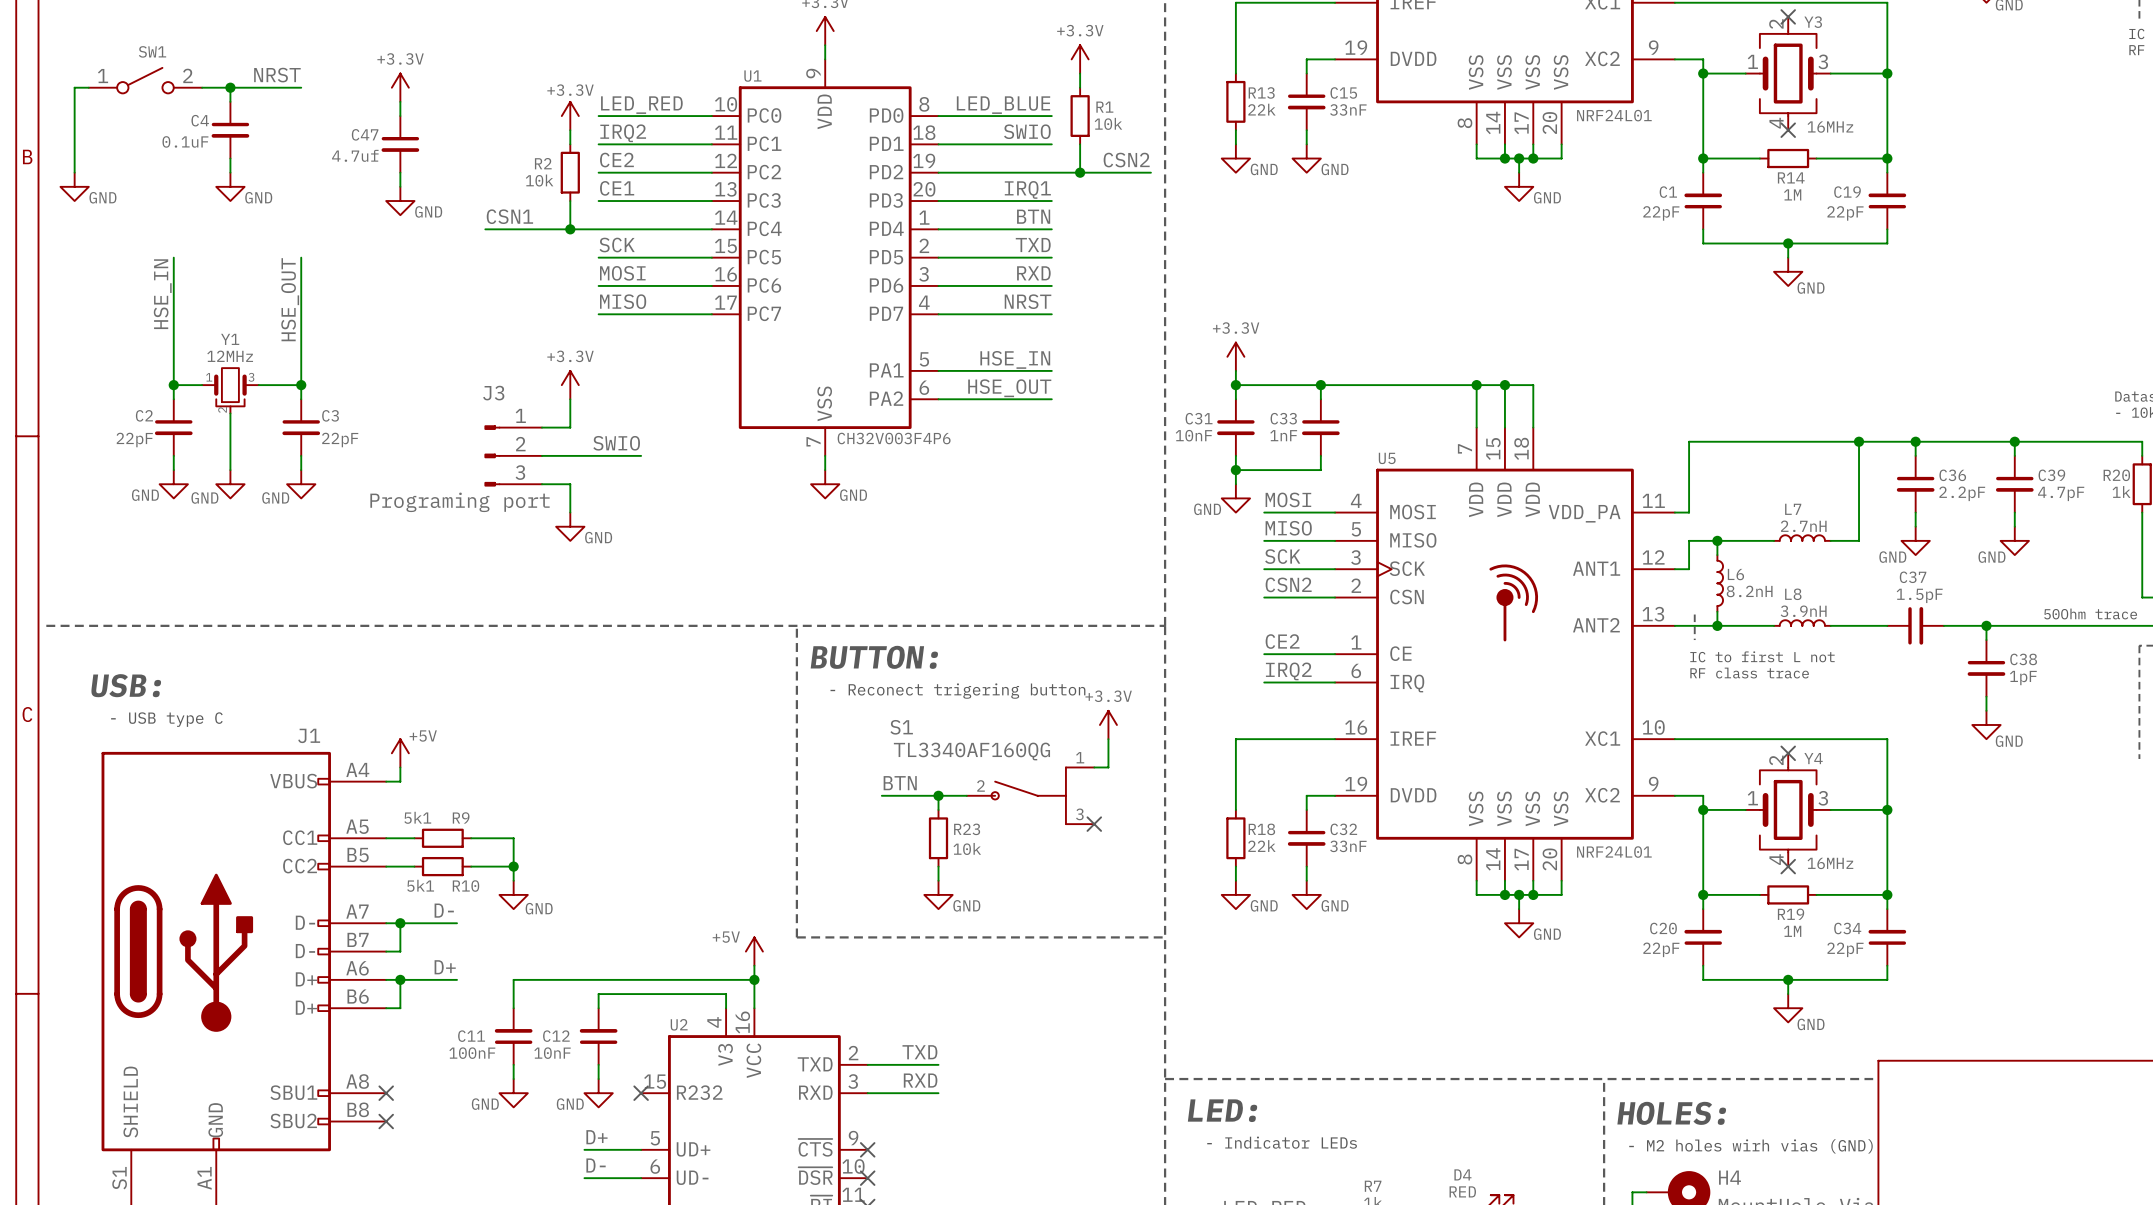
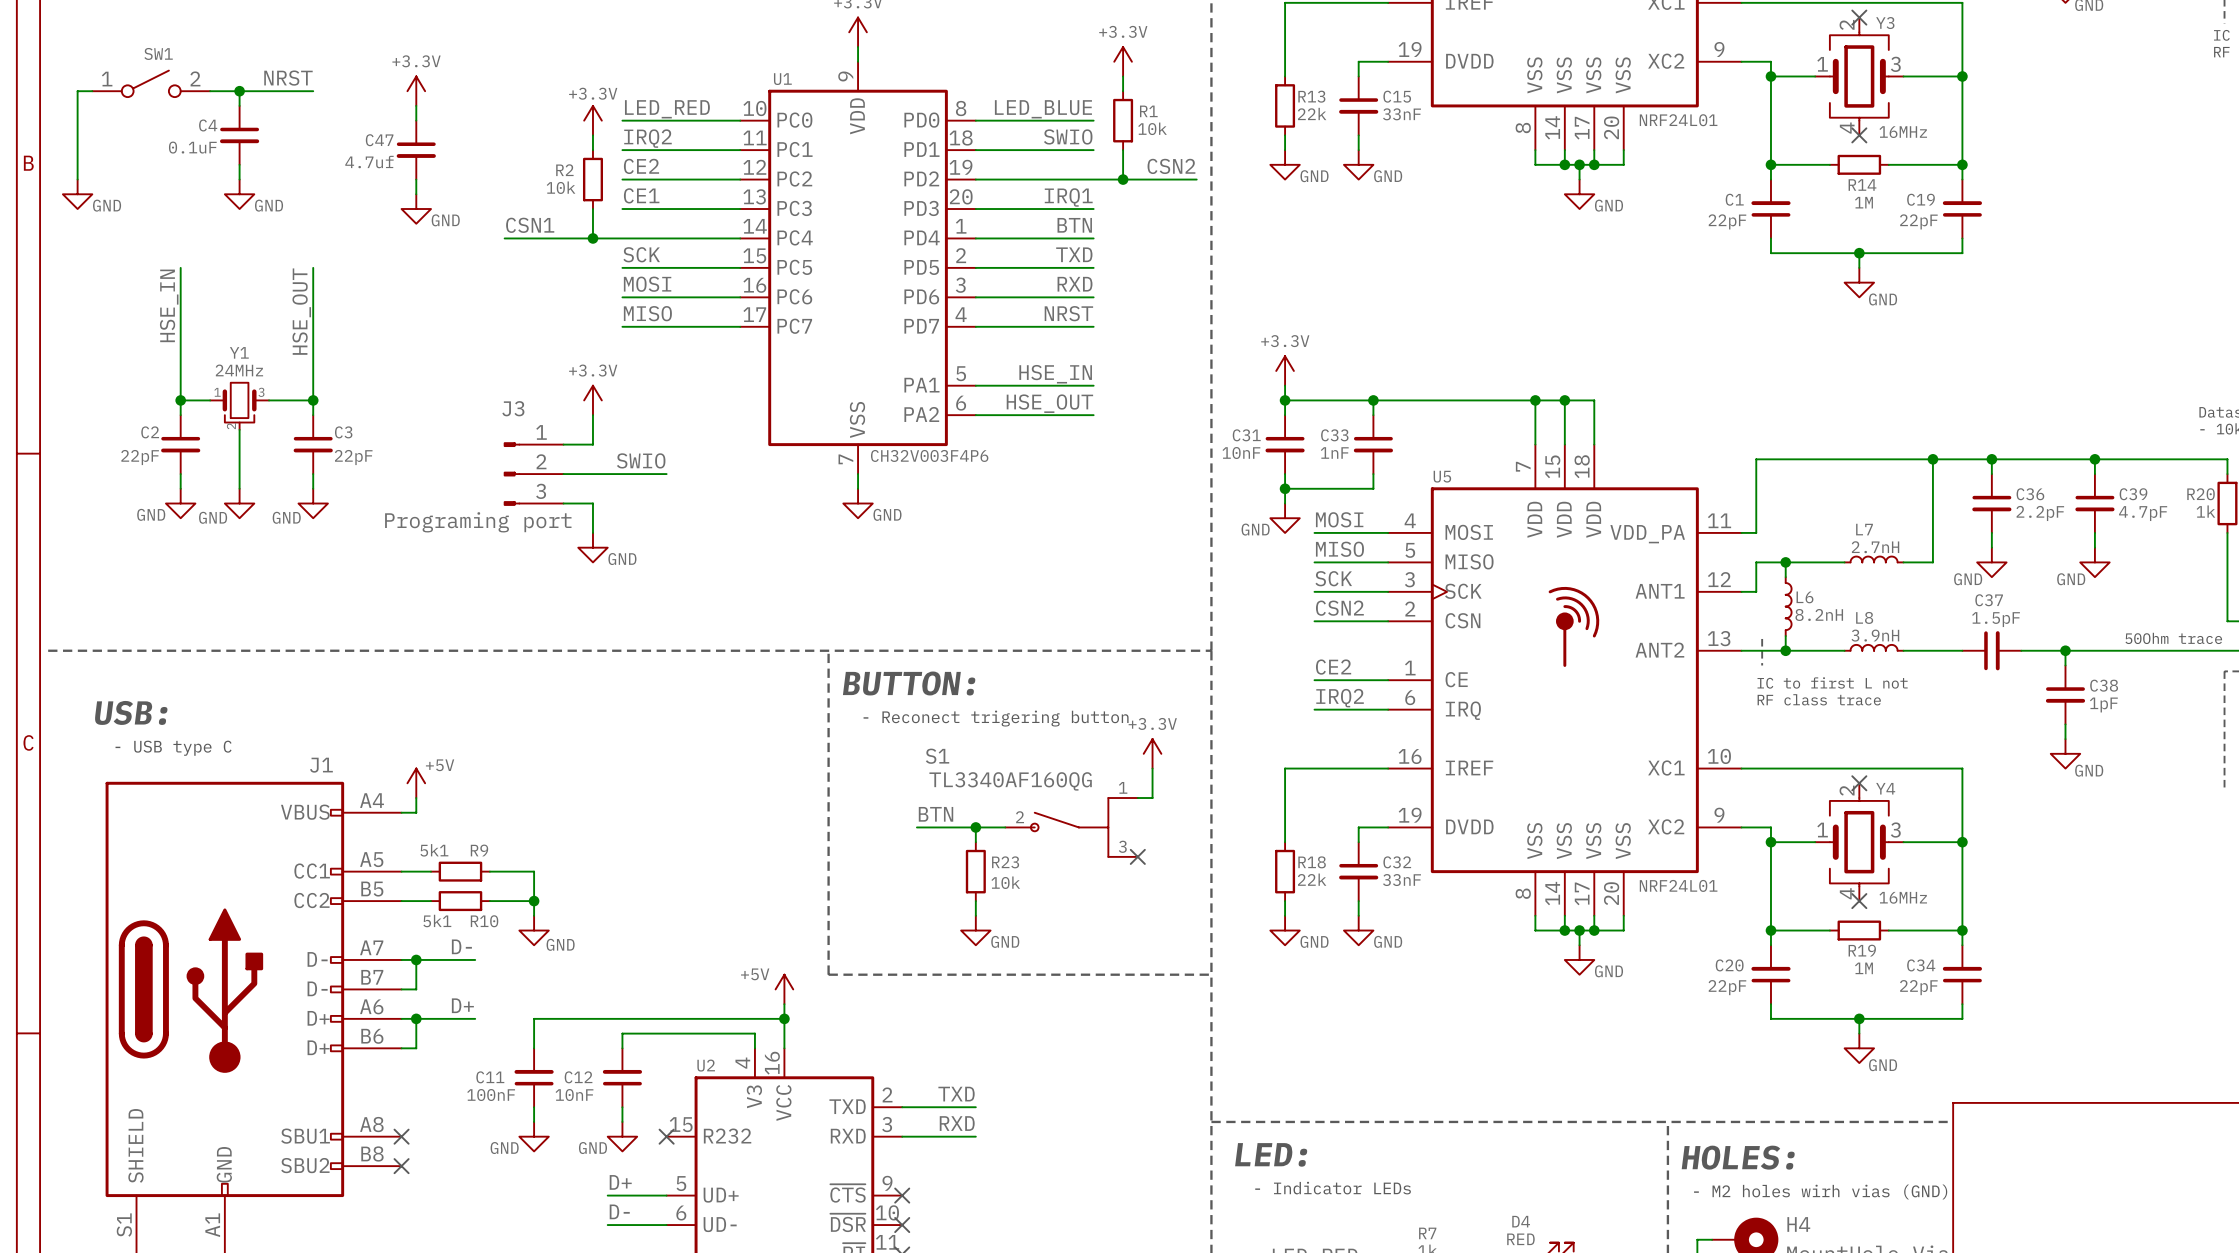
Y1 value: 12MHz (230, 356) -> 24MHz (239, 370)

